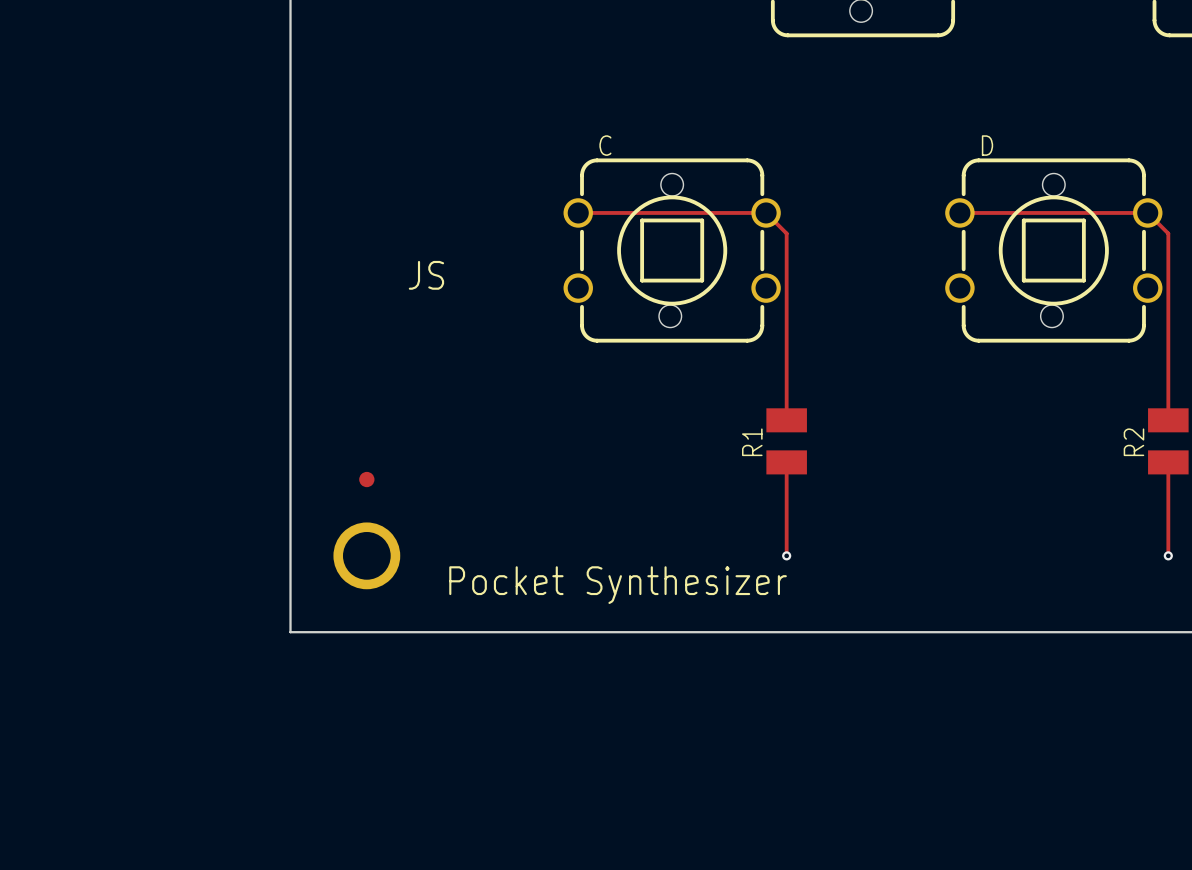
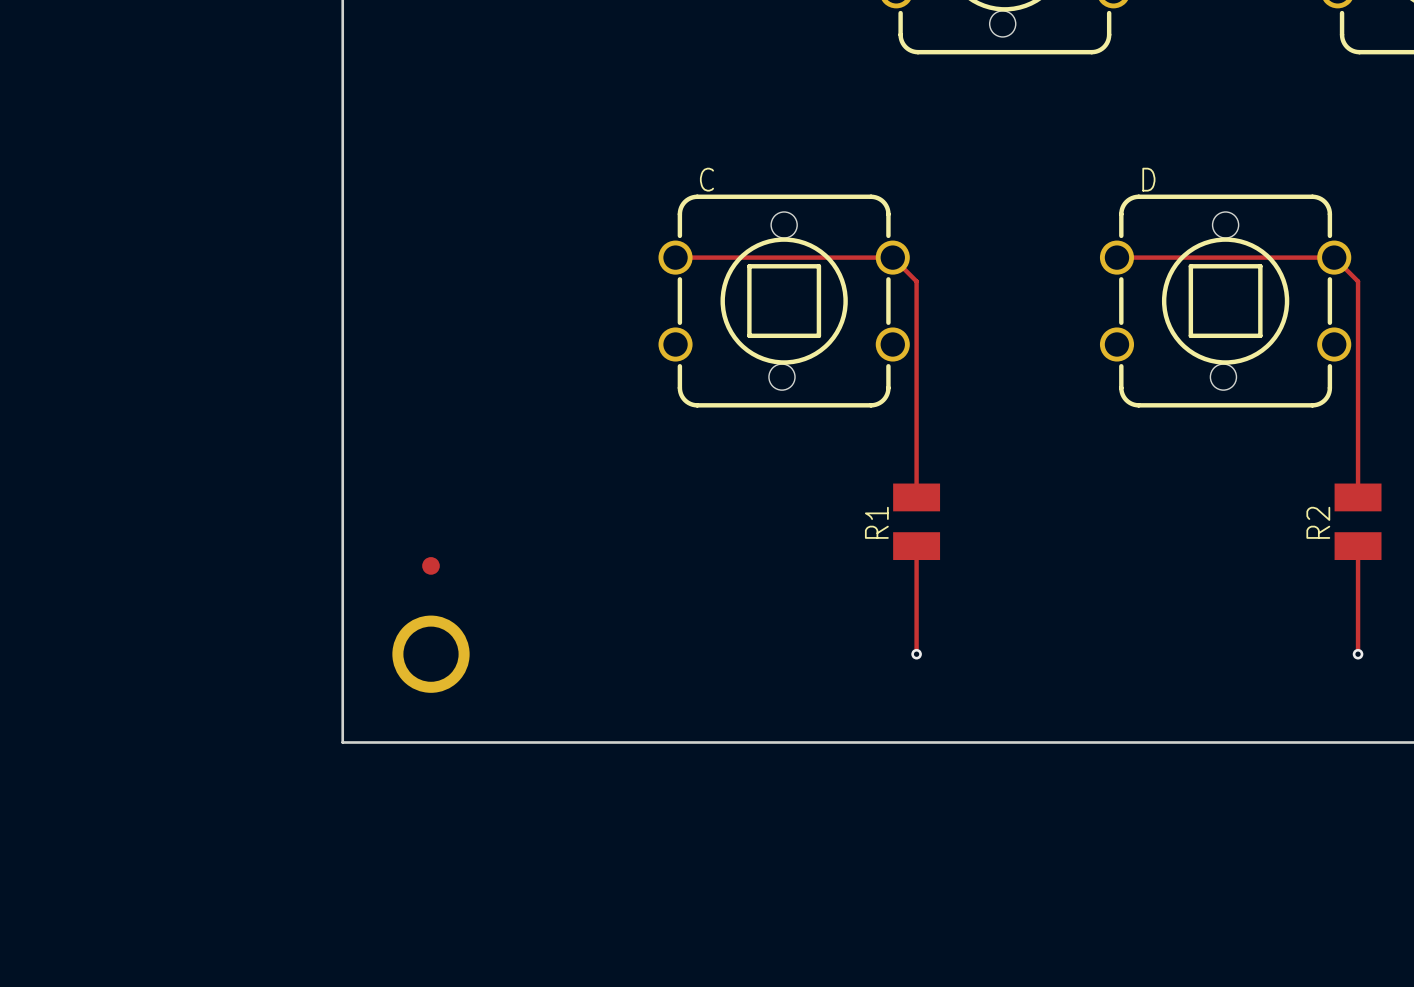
text: JS (426, 275) -> none
text: Pocket Synthesizer (618, 585) -> none

